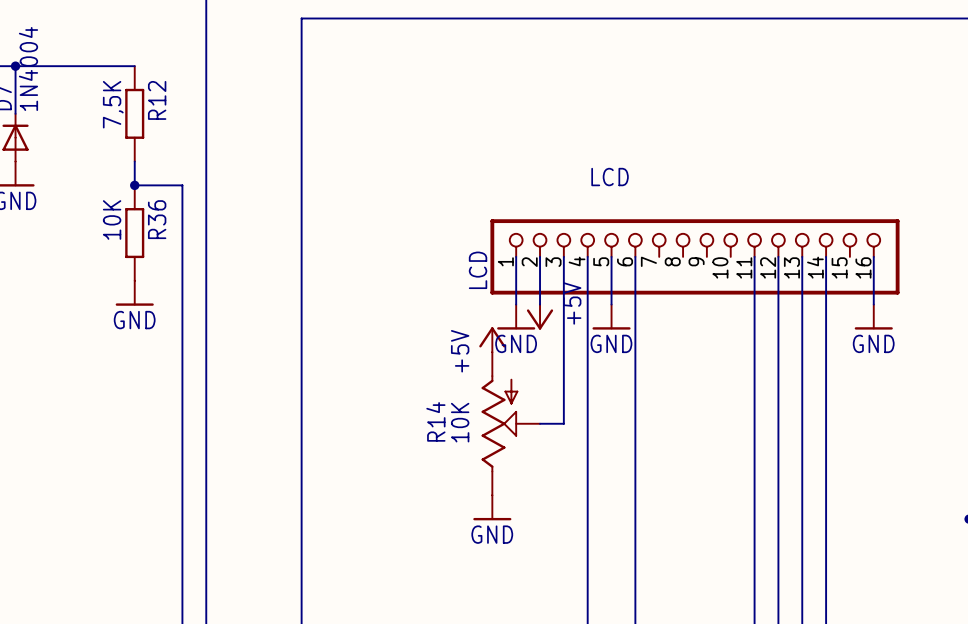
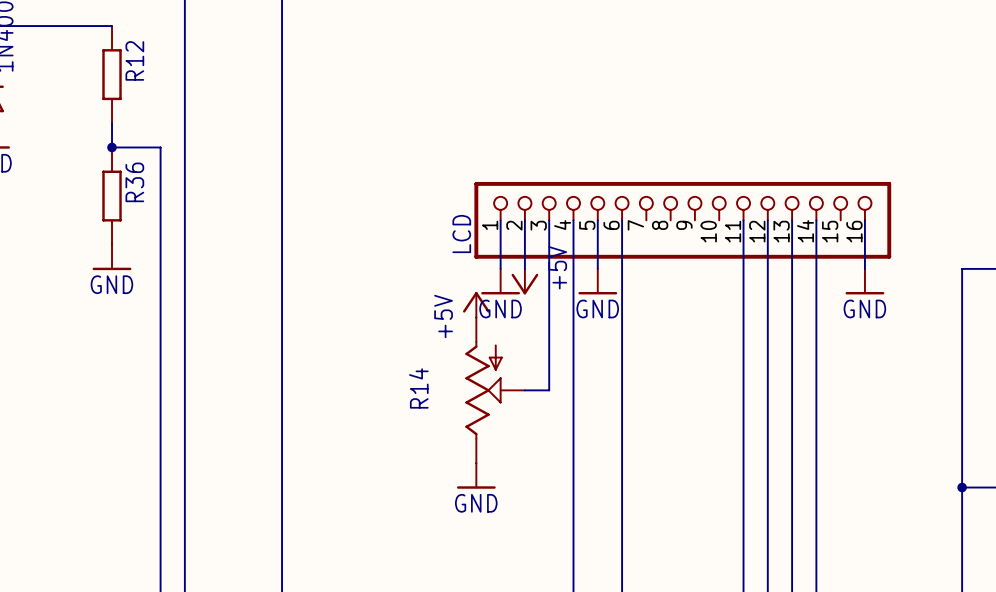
R12 value: 7,5K (113, 104) -> none
text: LCD (610, 177) -> none
R36 value: 10K (112, 219) -> none
R14 value: 10K (460, 422) -> none

